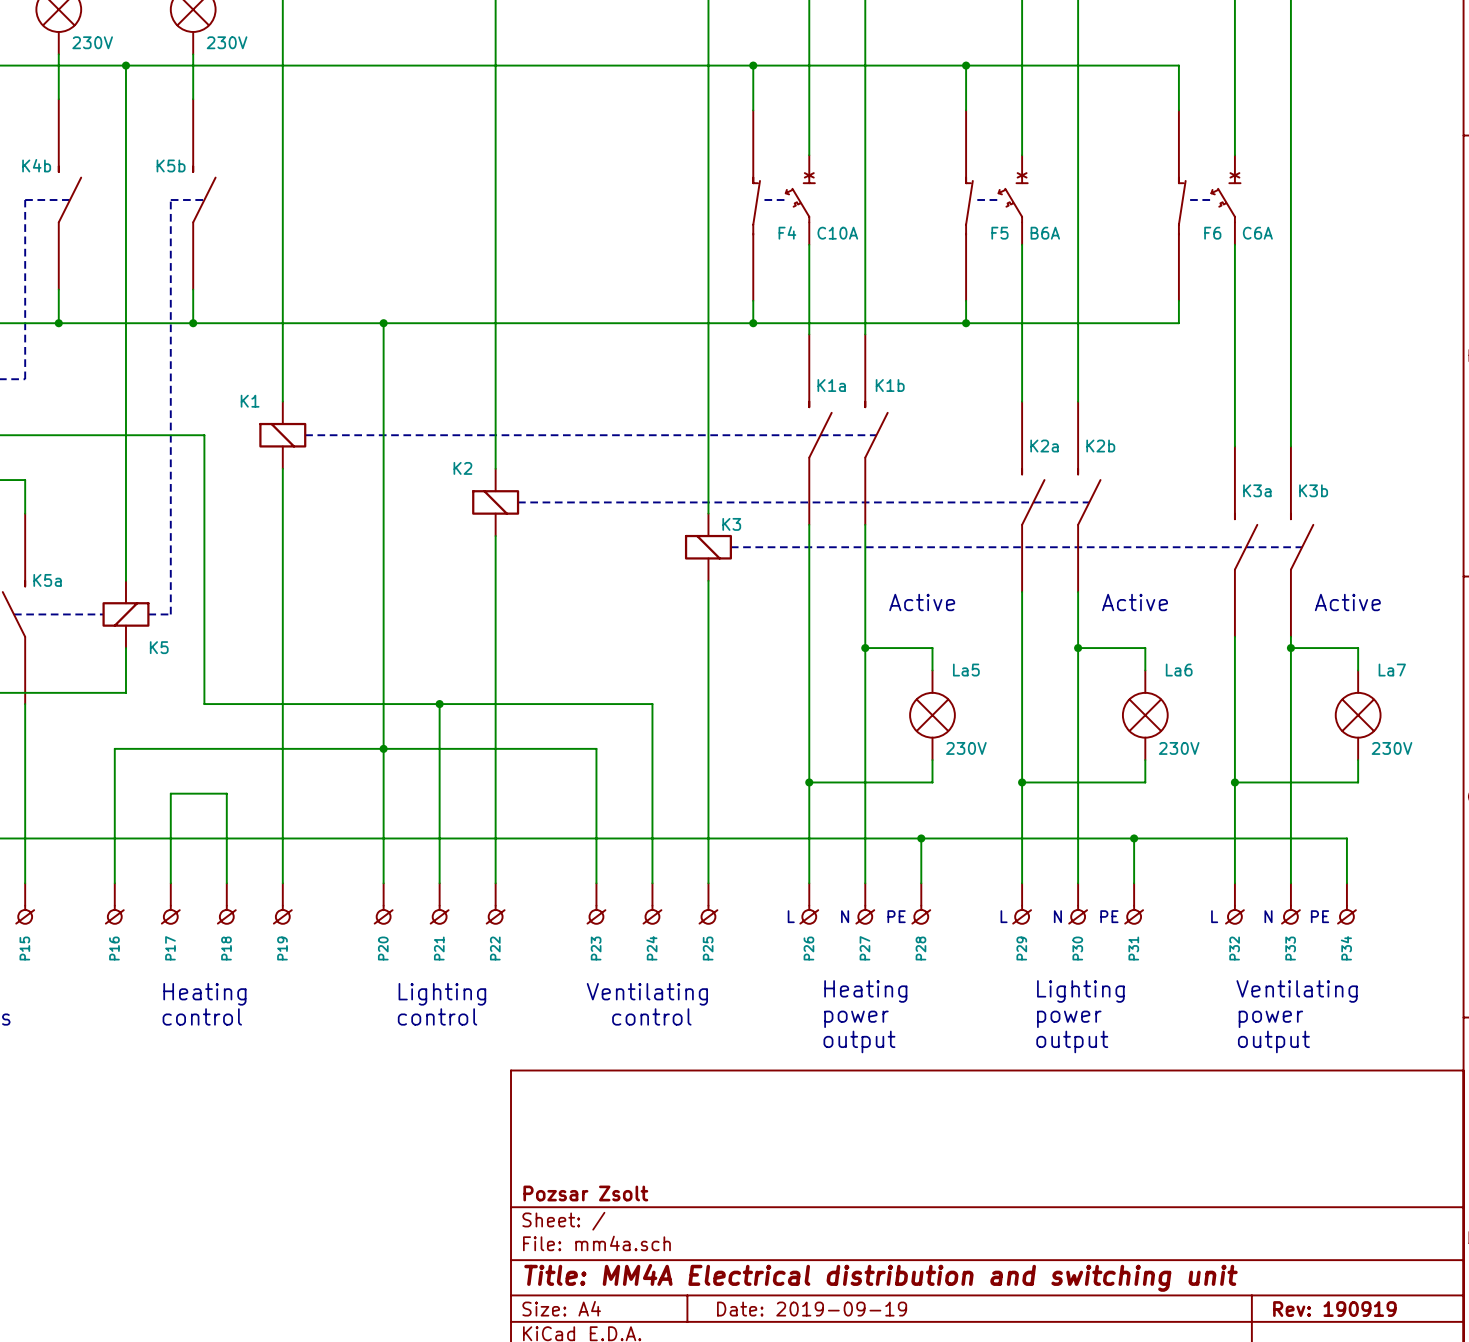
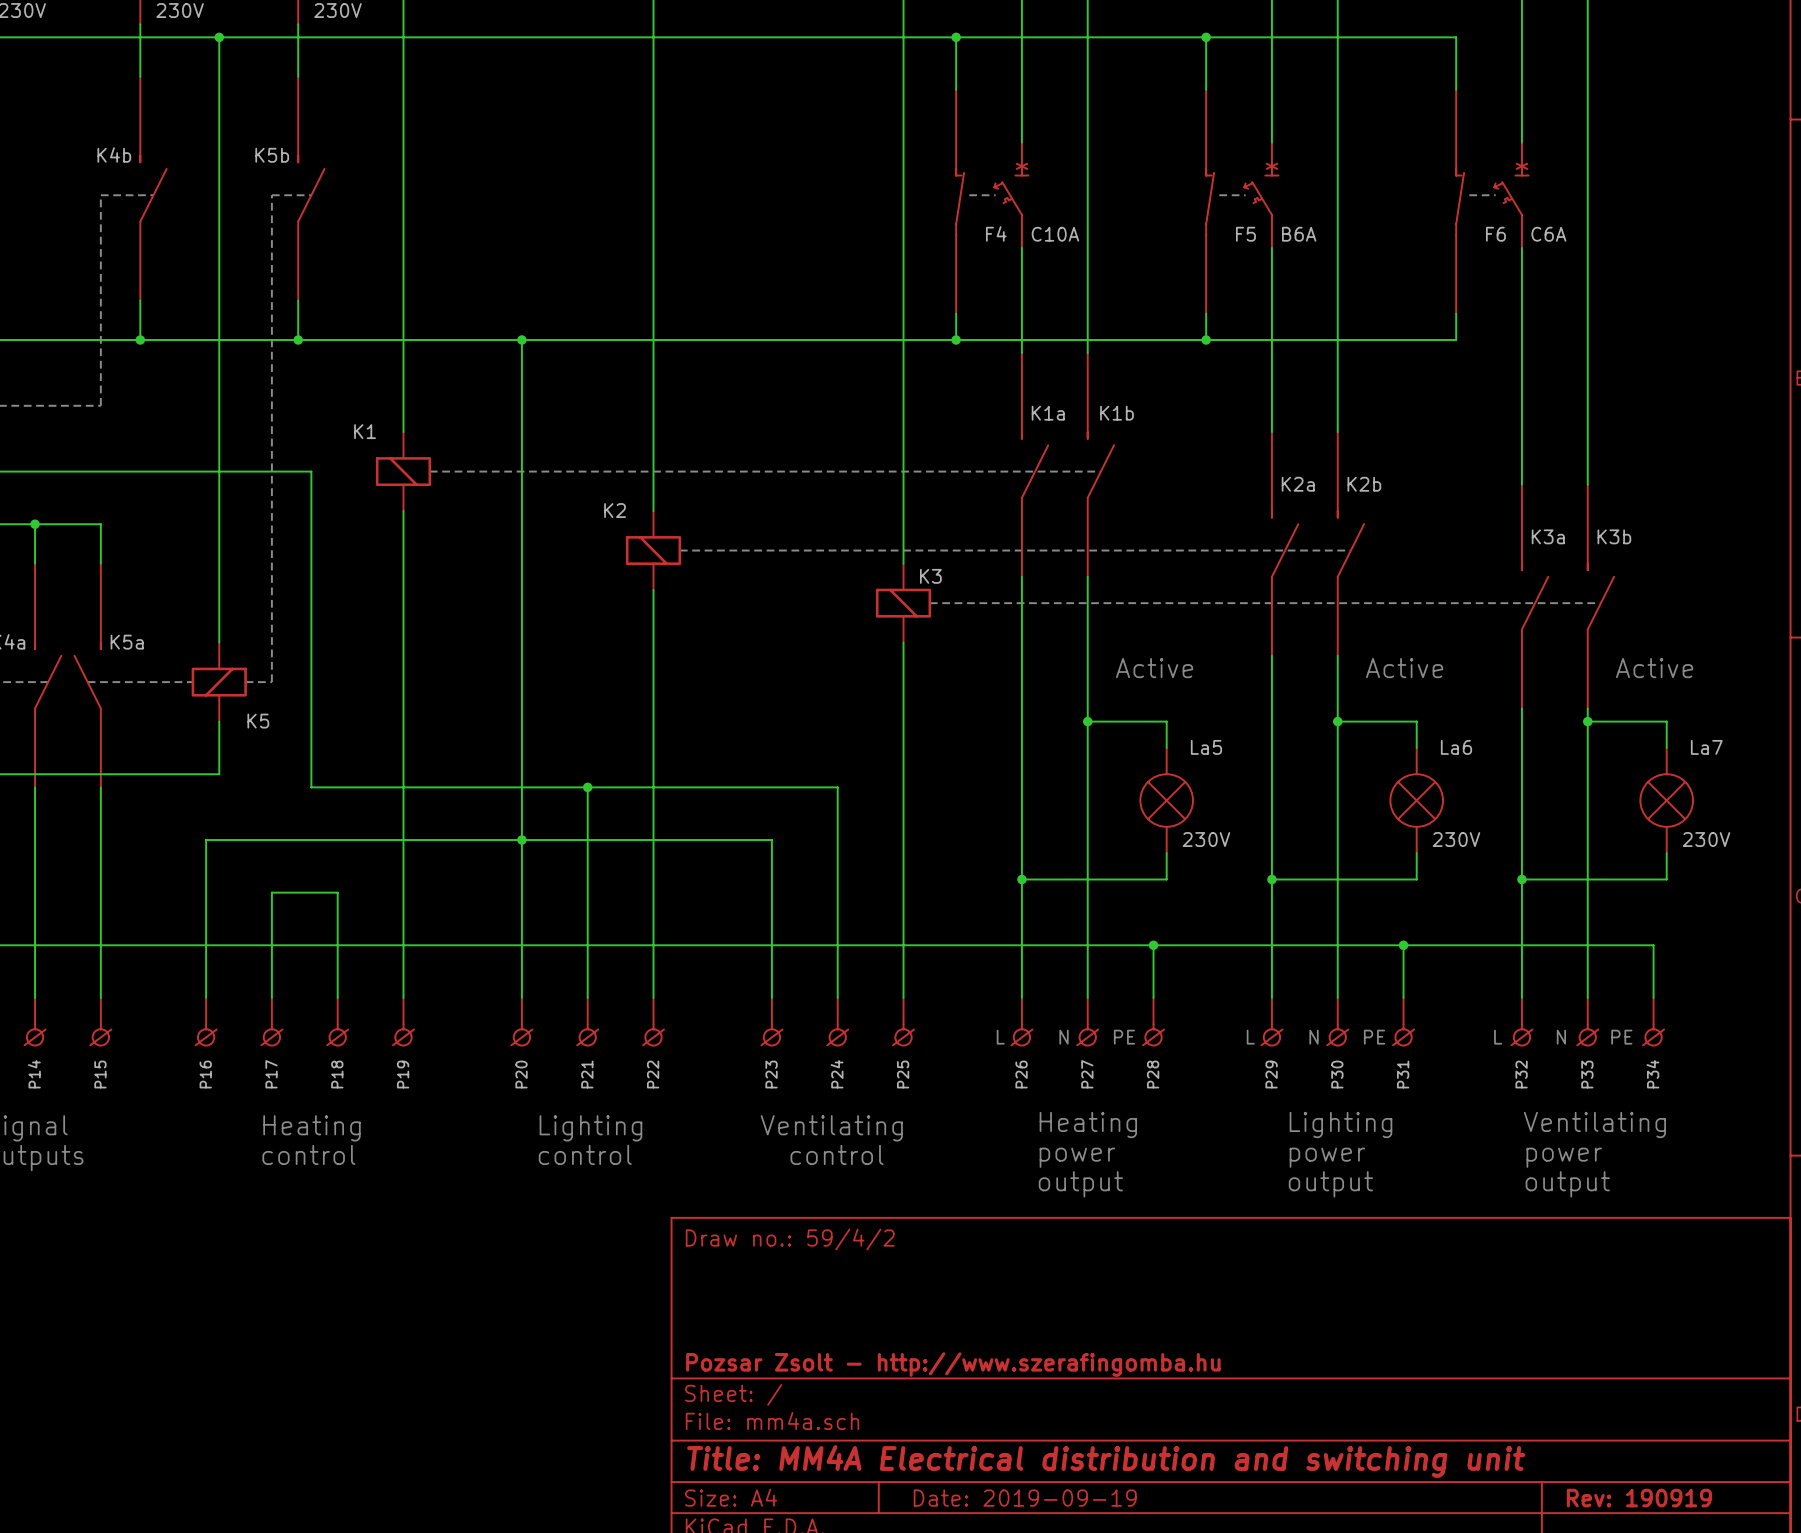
title block: none -> Draw no.: 59/4/2 (790, 1239)
title block: Pozsar Zsolt (585, 1193) -> Pozsar Zsolt - http://www.szerafingomba.hu (953, 1364)

